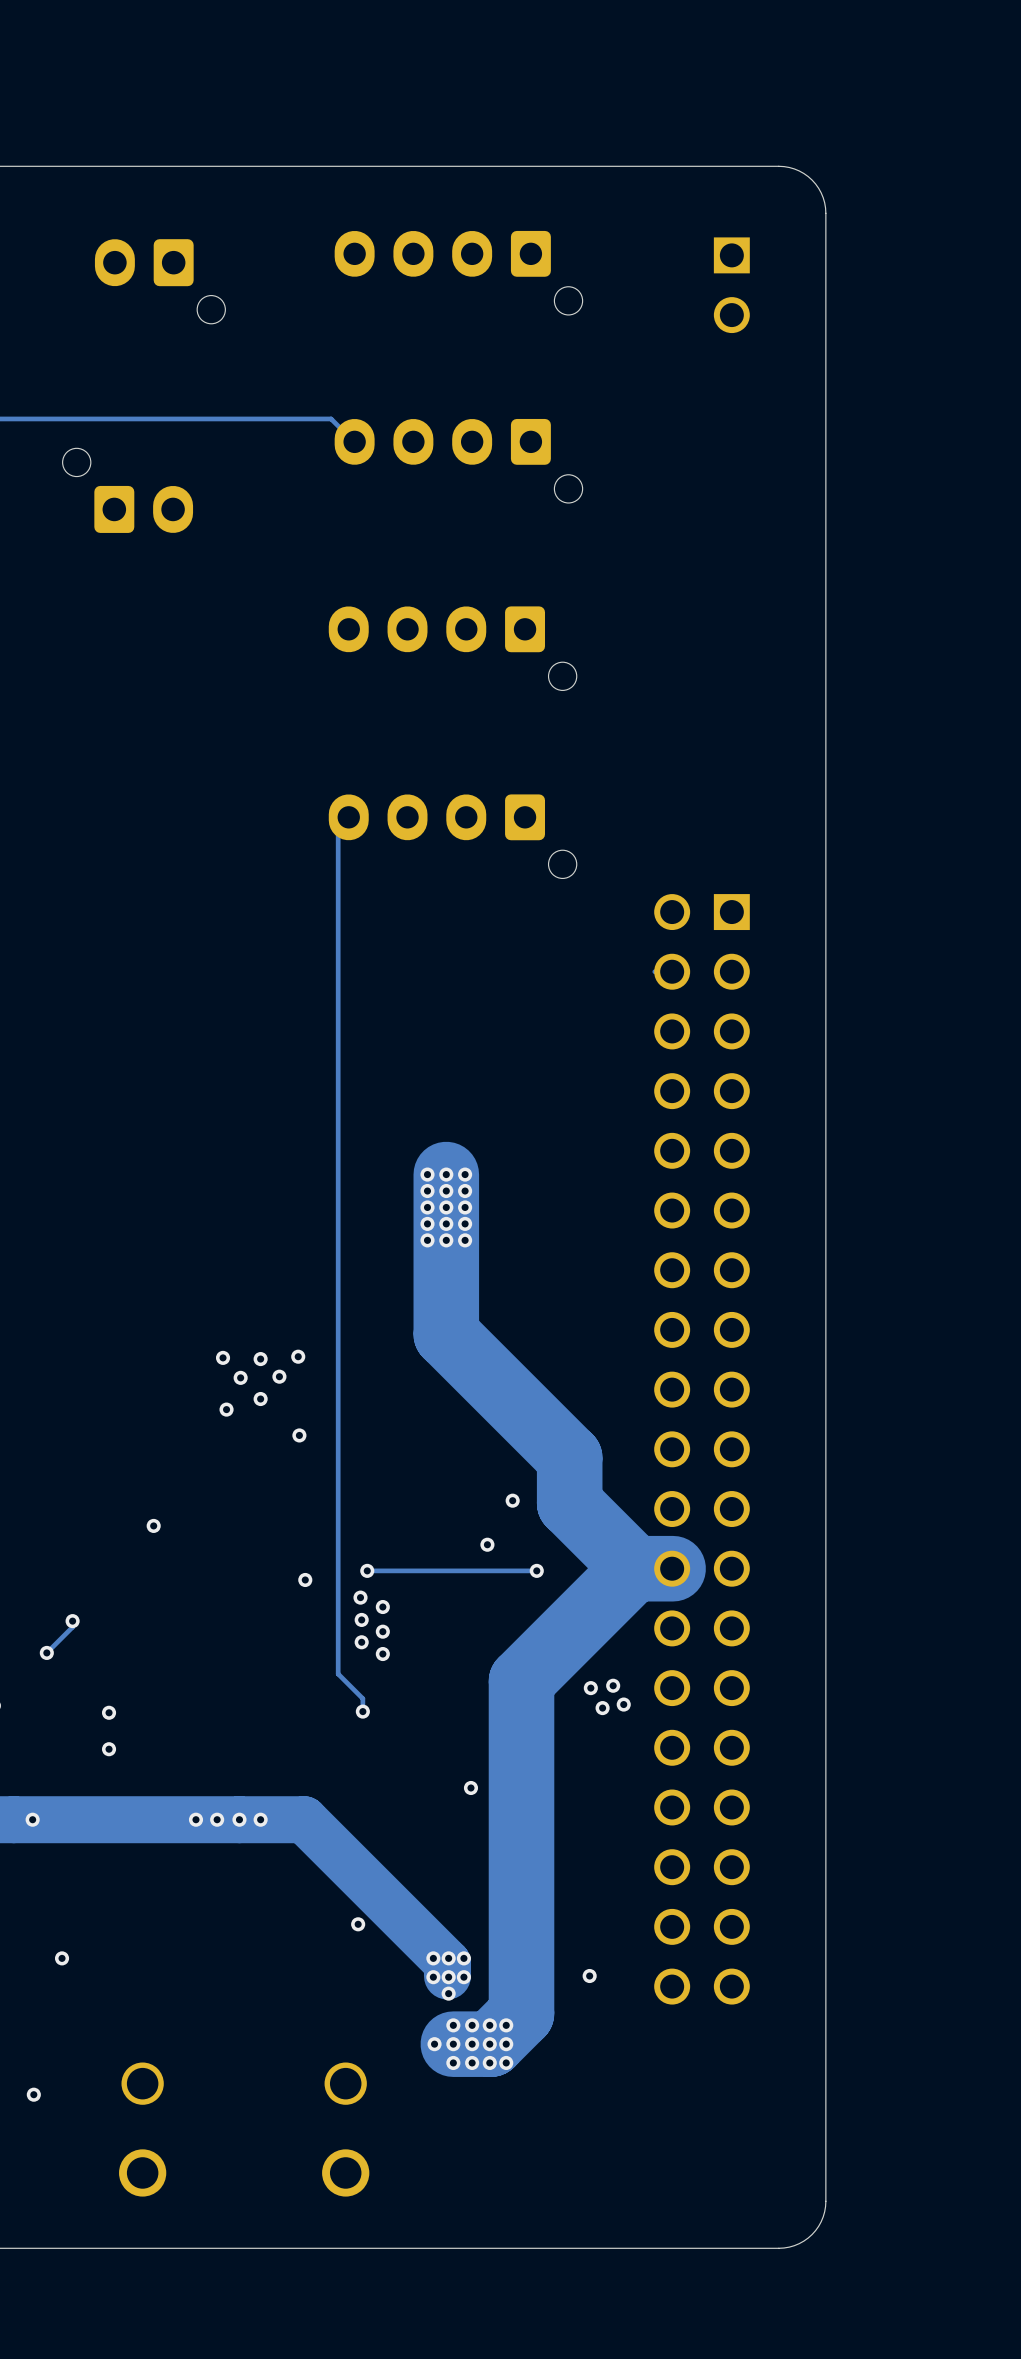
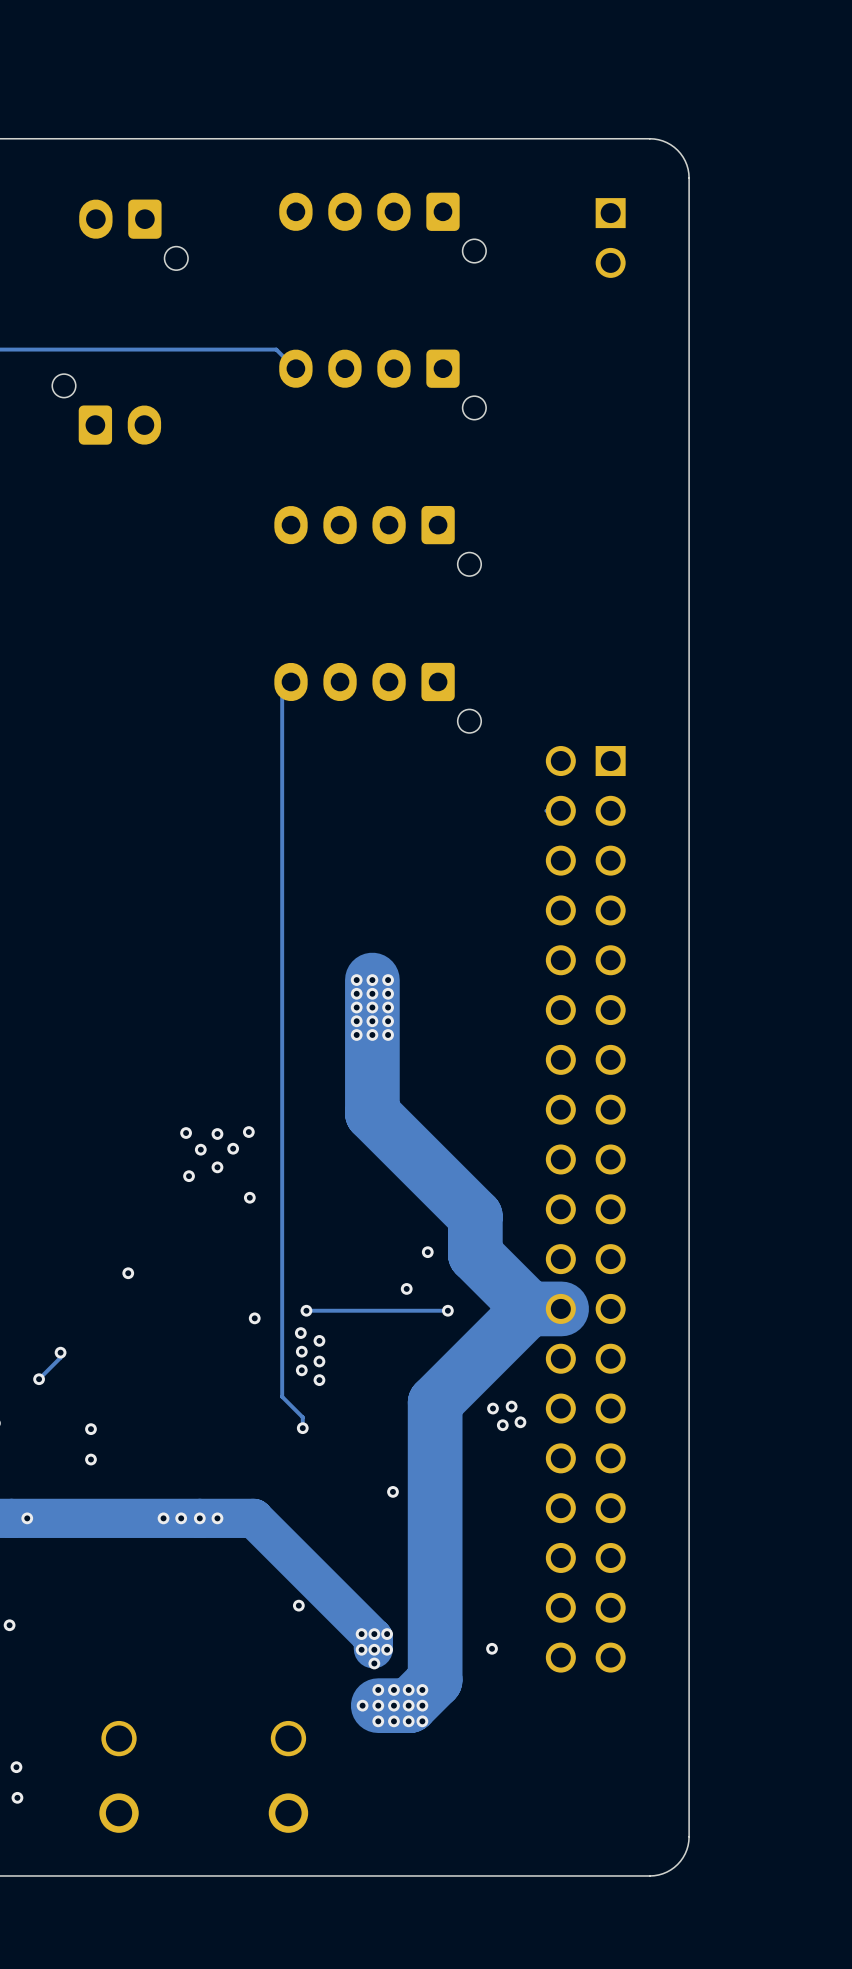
via: none -> (9, 1625)
via: (62, 1958) -> none
via: (33, 2094) -> none
via: none -> (16, 1767)
via: none -> (17, 1797)

